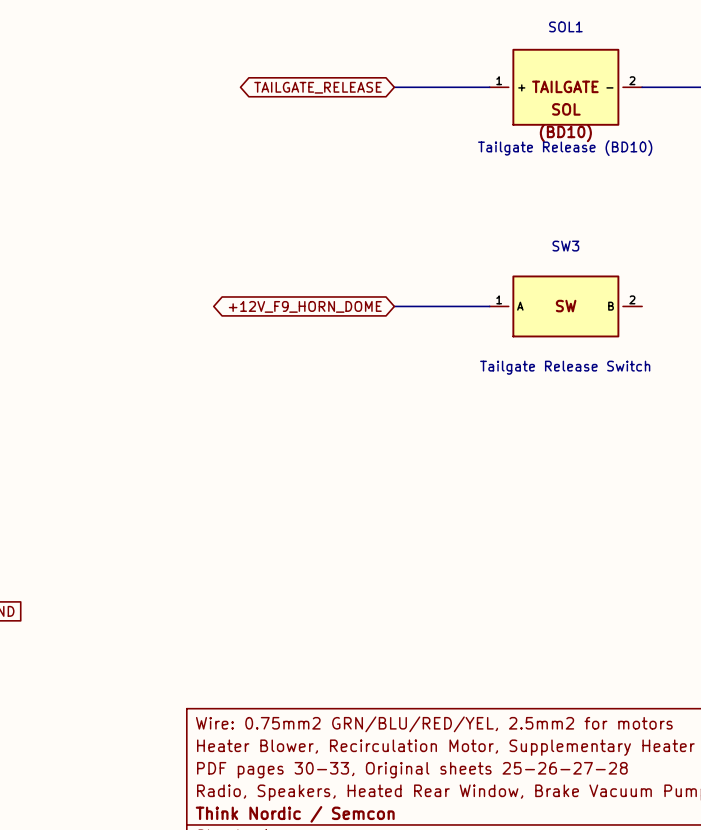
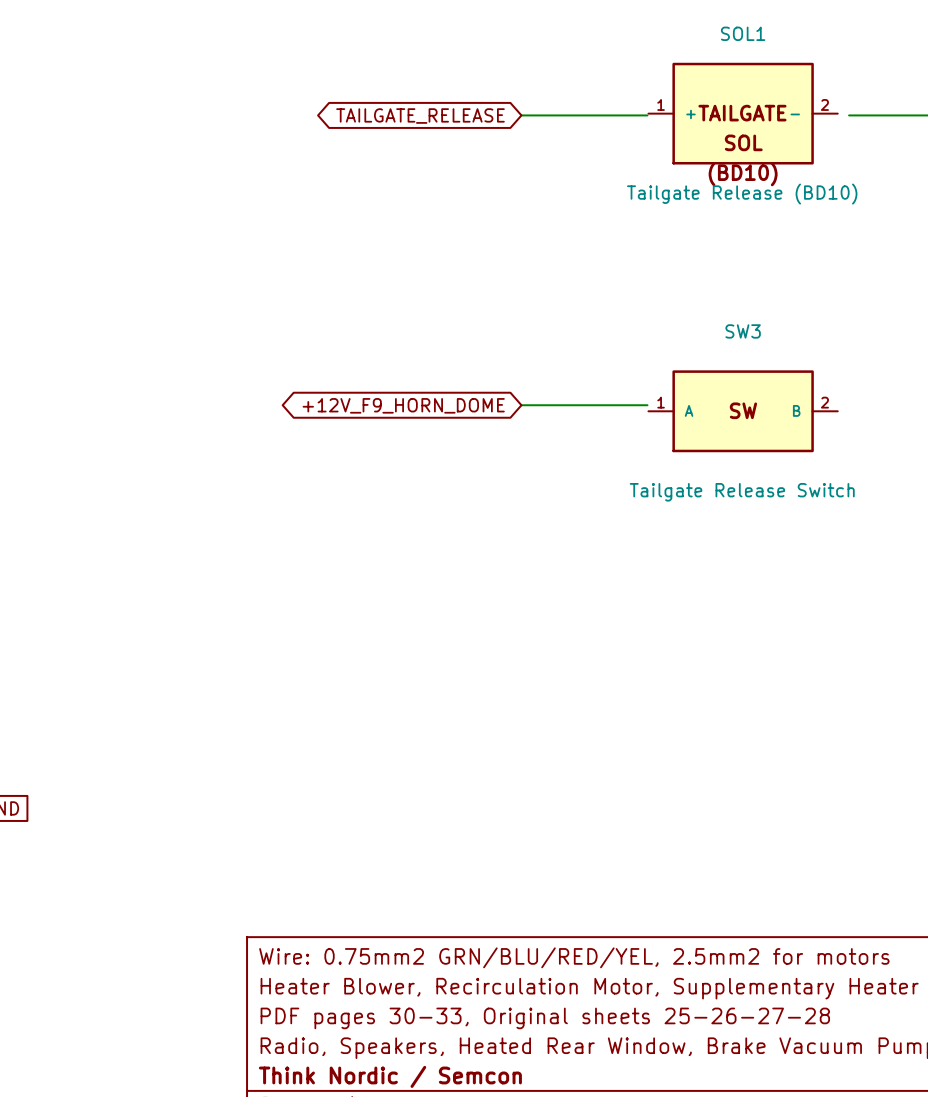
SOL1 symbol: [489, 48, 643, 126] -> [648, 62, 838, 165]
SW3 symbol: [489, 275, 643, 338] -> [648, 370, 838, 453]

